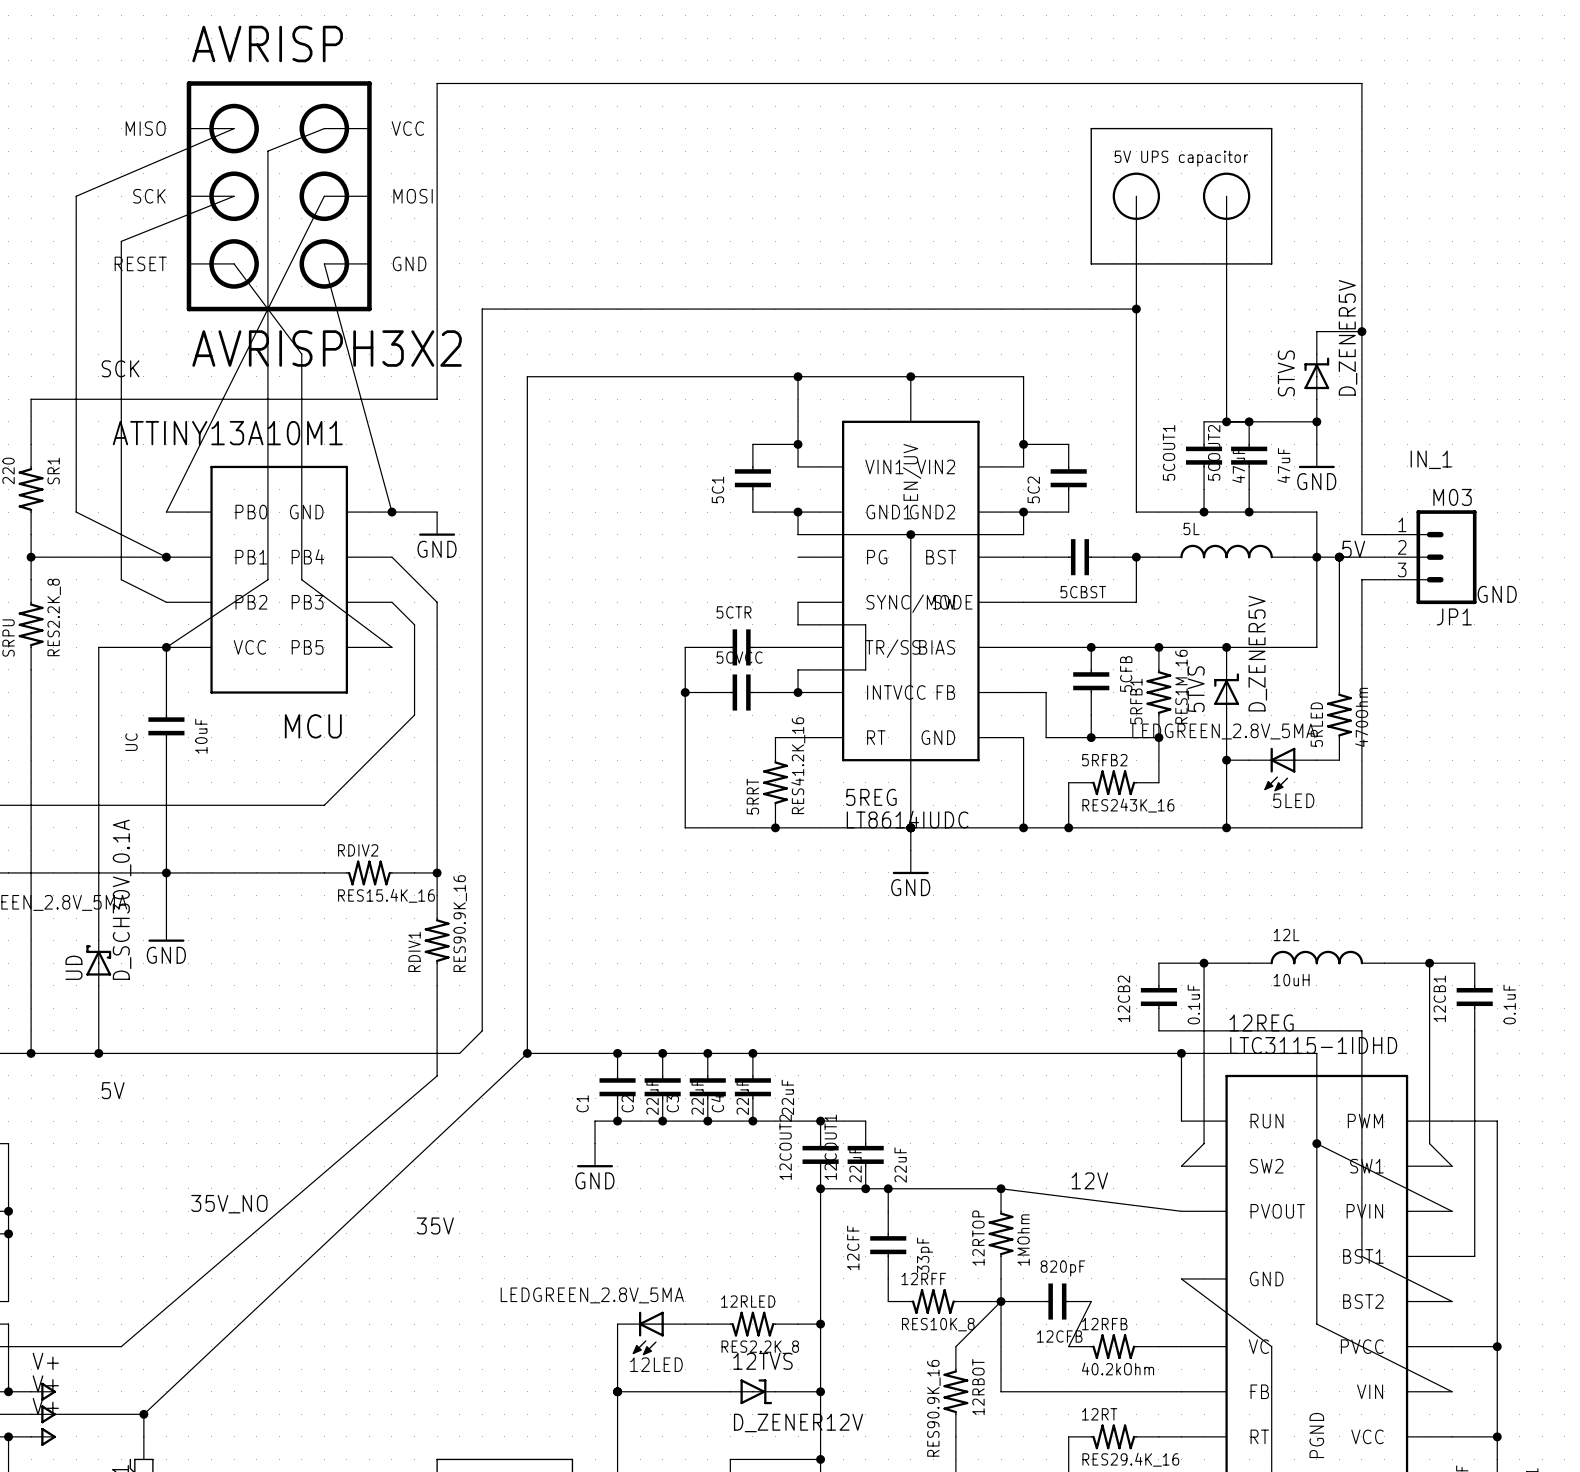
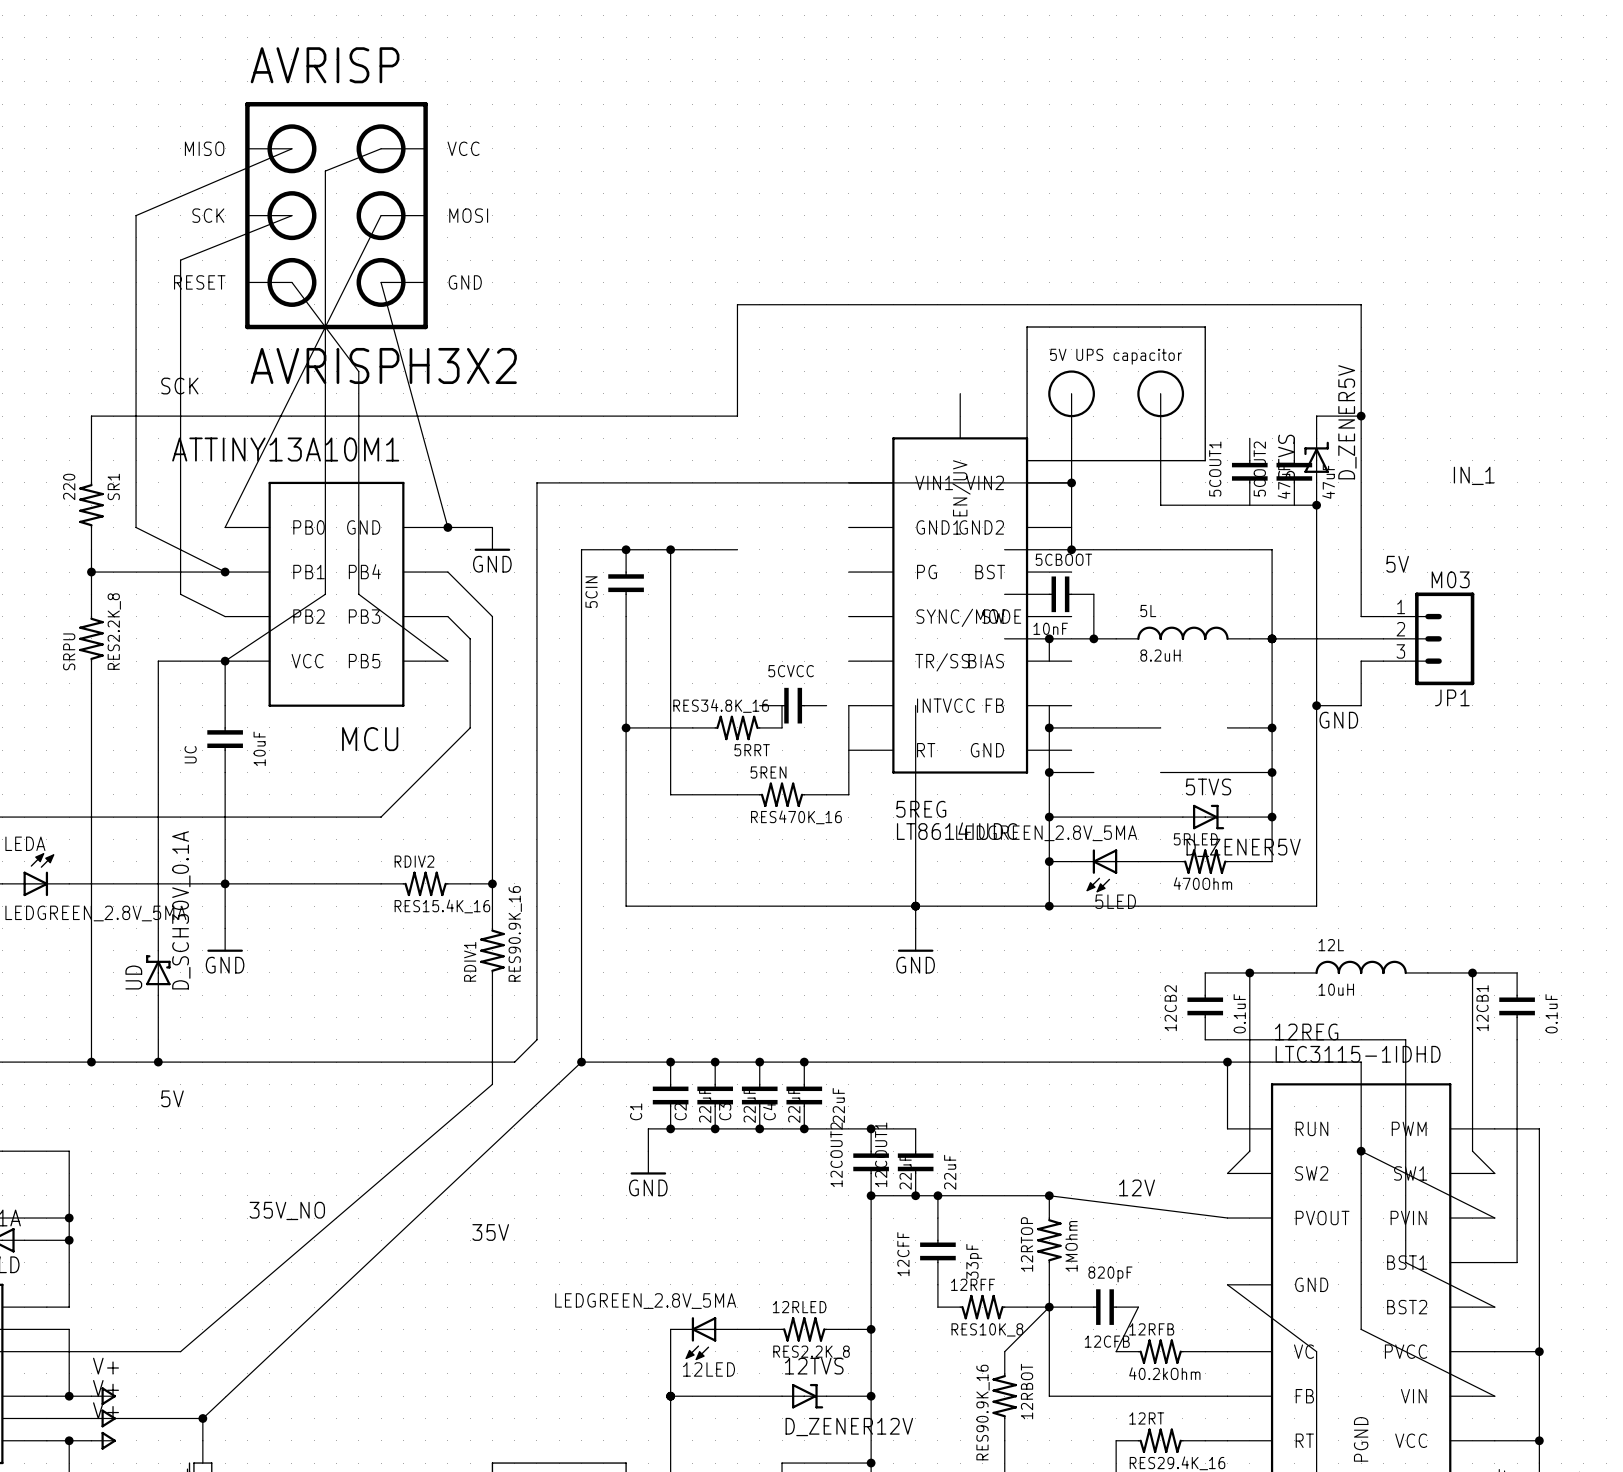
line: (1091, 128) (1271, 128) (1271, 263) (1091, 263) (1091, 128) -> (1027, 327) (1205, 327) (1205, 460) (1027, 460) (1027, 327)
text position: 5V UPS capacitor (1181, 158) -> 5V UPS capacitor (1116, 356)
part: (1136, 206) -> none
part: (1226, 206) -> none
wire: (1136, 241) (1136, 512) (1316, 512) -> (1361, 460) (1361, 527)
wire: (1226, 241) (1226, 421) -> none
wire: (1136, 309) (482, 309) (482, 466) -> (1071, 527) (1071, 482) (536, 482)
junction: (1136, 309) -> none
wire: (1316, 331) (1361, 331) -> none
junction: (1361, 331) -> none
wire: none -> (1361, 371) (1361, 416) (1316, 416) (1316, 438)
wire: (798, 376) (798, 466) -> none
junction: (798, 376) -> none
junction: (910, 376) -> none
STVS position: (1316, 376) -> (1316, 460)
part: none -> (1071, 404)
part: none -> (1160, 404)
wire: (437, 399) (437, 83) (1361, 83) (1361, 534) (1384, 534) -> (492, 416) (737, 416) (737, 304) (1361, 304) (1361, 349)
wire: (1023, 421) (1023, 376) (527, 376) (527, 534) -> (737, 549) (581, 549)
wire: none -> (1160, 438) (1160, 505) (1316, 505)
wire: (1204, 421) (1316, 421) -> none
junction: (1226, 421) -> none
junction: (1249, 421) -> none
junction position: (1316, 421) -> (1361, 416)
wire: (752, 444) (798, 444) -> none
junction: (798, 444) -> none
junction: (1023, 444) -> none
power symbol: GND (1316, 456) -> none
junction: none -> (1071, 482)
wire: none -> (1316, 482) (1316, 906) (626, 906) (626, 616)
5C1: (752, 478) -> none
5C2: (1068, 478) -> none
wire: (1204, 489) (1204, 512) -> none
wire: (1249, 489) (1249, 512) -> none
wire: (752, 512) (798, 512) (798, 534) (955, 534) -> none
junction: (798, 512) -> none
wire: (1023, 512) (1068, 512) -> none
junction: (1023, 512) -> none
junction: (1204, 512) -> none
junction position: (1249, 512) -> (1316, 505)
junction: none -> (626, 549)
wire: none -> (670, 549) (670, 794) (737, 794)
junction: none -> (670, 549)
wire: (910, 534) (910, 850) -> none
junction: (910, 534) -> none
wire: none -> (1071, 549) (1272, 549) (1272, 661)
junction: none -> (1071, 549)
5L position: (1226, 551) -> (1182, 633)
wire: (1023, 557) (1046, 557) -> (1004, 594) (1027, 594)
5CBST: (1079, 557) -> none
wire: (1113, 557) (1158, 557) -> none
wire: (1136, 557) (1136, 602) (1023, 602) -> none
junction: (1136, 557) -> none
wire: (1294, 557) (1384, 557) -> none
junction: (1316, 557) -> none
wire: (1339, 557) (1339, 669) -> none
junction: (1339, 557) -> none
JP1 position: (1430, 557) -> (1428, 638)
5CIN: none -> (626, 583)
5CBOOT: none -> 10nF (1060, 594)
wire: (1384, 579) (1361, 579) (1361, 827) (685, 827) (685, 647) (707, 647) -> none
label: GND (1497, 594) -> none
wire: (798, 602) (798, 624) (865, 624) (865, 669) (798, 669) (798, 692) (775, 692) -> none
wire: (1316, 602) (1316, 647) (1023, 647) -> (1361, 616) (1383, 616)
wire: none -> (1004, 638) (1116, 638)
junction: none -> (1049, 638)
junction: none -> (1093, 638)
wire: none -> (1249, 638) (1383, 638)
5L value: none -> 8.2uH (1160, 655)
5CTR: (741, 647) -> none
wire: (775, 647) (798, 647) -> none
junction: (1091, 647) -> none
junction: (1158, 647) -> none
junction position: (1226, 647) -> (1272, 638)
wire: none -> (1383, 661) (1361, 661) (1361, 705) (1316, 705)
wire: none -> (1272, 683) (1272, 727) (1227, 727)
5CFB: (1091, 681) -> none
5TVS rotation: 0° (1226, 689) -> 90° clockwise (1208, 817)
wire: (685, 692) (707, 692) -> none
junction: (685, 692) -> none
wire: none -> (782, 705) (782, 727)
wire: none -> (848, 705) (848, 794) (826, 794)
junction: (798, 692) -> none
wire: none -> (915, 705) (915, 928)
wire: none -> (1049, 705) (1049, 906)
wire: (1023, 692) (1046, 692) (1046, 737) (1158, 737) (1158, 782) -> none
5RFB1: RES1M_16 (1158, 692) -> none
5TVS position: (1226, 692) -> (1205, 817)
junction: none -> (1316, 705)
label: none -> GND (1338, 720)
wire: none -> (626, 727) (692, 727)
junction: none -> (626, 727)
wire: none -> (1049, 727) (1160, 727)
junction: none -> (1049, 727)
wire: (1091, 715) (1091, 737) -> (1049, 638) (1049, 661)
junction: none -> (1272, 727)
5RLED rotation: 0° (1339, 715) -> 90° clockwise (1205, 861)
5RLED position: (1339, 715) -> (1205, 861)
wire: (775, 737) (798, 737) -> none
wire: (1023, 737) (1023, 827) -> none
junction: (1091, 737) -> none
junction: (1158, 737) -> none
wire: none -> (1049, 772) (1093, 772)
junction: none -> (1049, 772)
wire: (1226, 760) (1249, 760) -> (1272, 772) (1160, 772)
wire: (1316, 760) (1339, 760) -> none
5RRT value: RES41.2K_16 (798, 765) -> RES34.8K_16 (721, 705)
5LED position: (1282, 769) -> (1105, 870)
5REN: none -> RES470K_16 (782, 794)
5RRT rotation: 0° (775, 782) -> 90° counterclockwise (737, 727)
5RRT position: (775, 782) -> (737, 727)
wire: (1068, 782) (1068, 827) -> (1093, 594) (1093, 638)
5RFB2: RES243K_16 (1113, 782) -> none
wire: none -> (1049, 817) (1182, 817)
junction: none -> (1049, 817)
wire: none -> (1227, 817) (1272, 817)
junction: (775, 827) -> none
junction: (910, 827) -> none
junction: (1023, 827) -> none
junction: (1068, 827) -> none
wire: none -> (1272, 839) (1272, 861) (1249, 861)
junction position: (1226, 827) -> (1272, 817)
wire: none -> (1049, 861) (1071, 861)
junction: none -> (1049, 861)
wire: none -> (1138, 861) (1160, 861)
power symbol position: GND (910, 862) -> GND (915, 940)
junction: none -> (915, 906)
junction: none -> (1049, 906)

